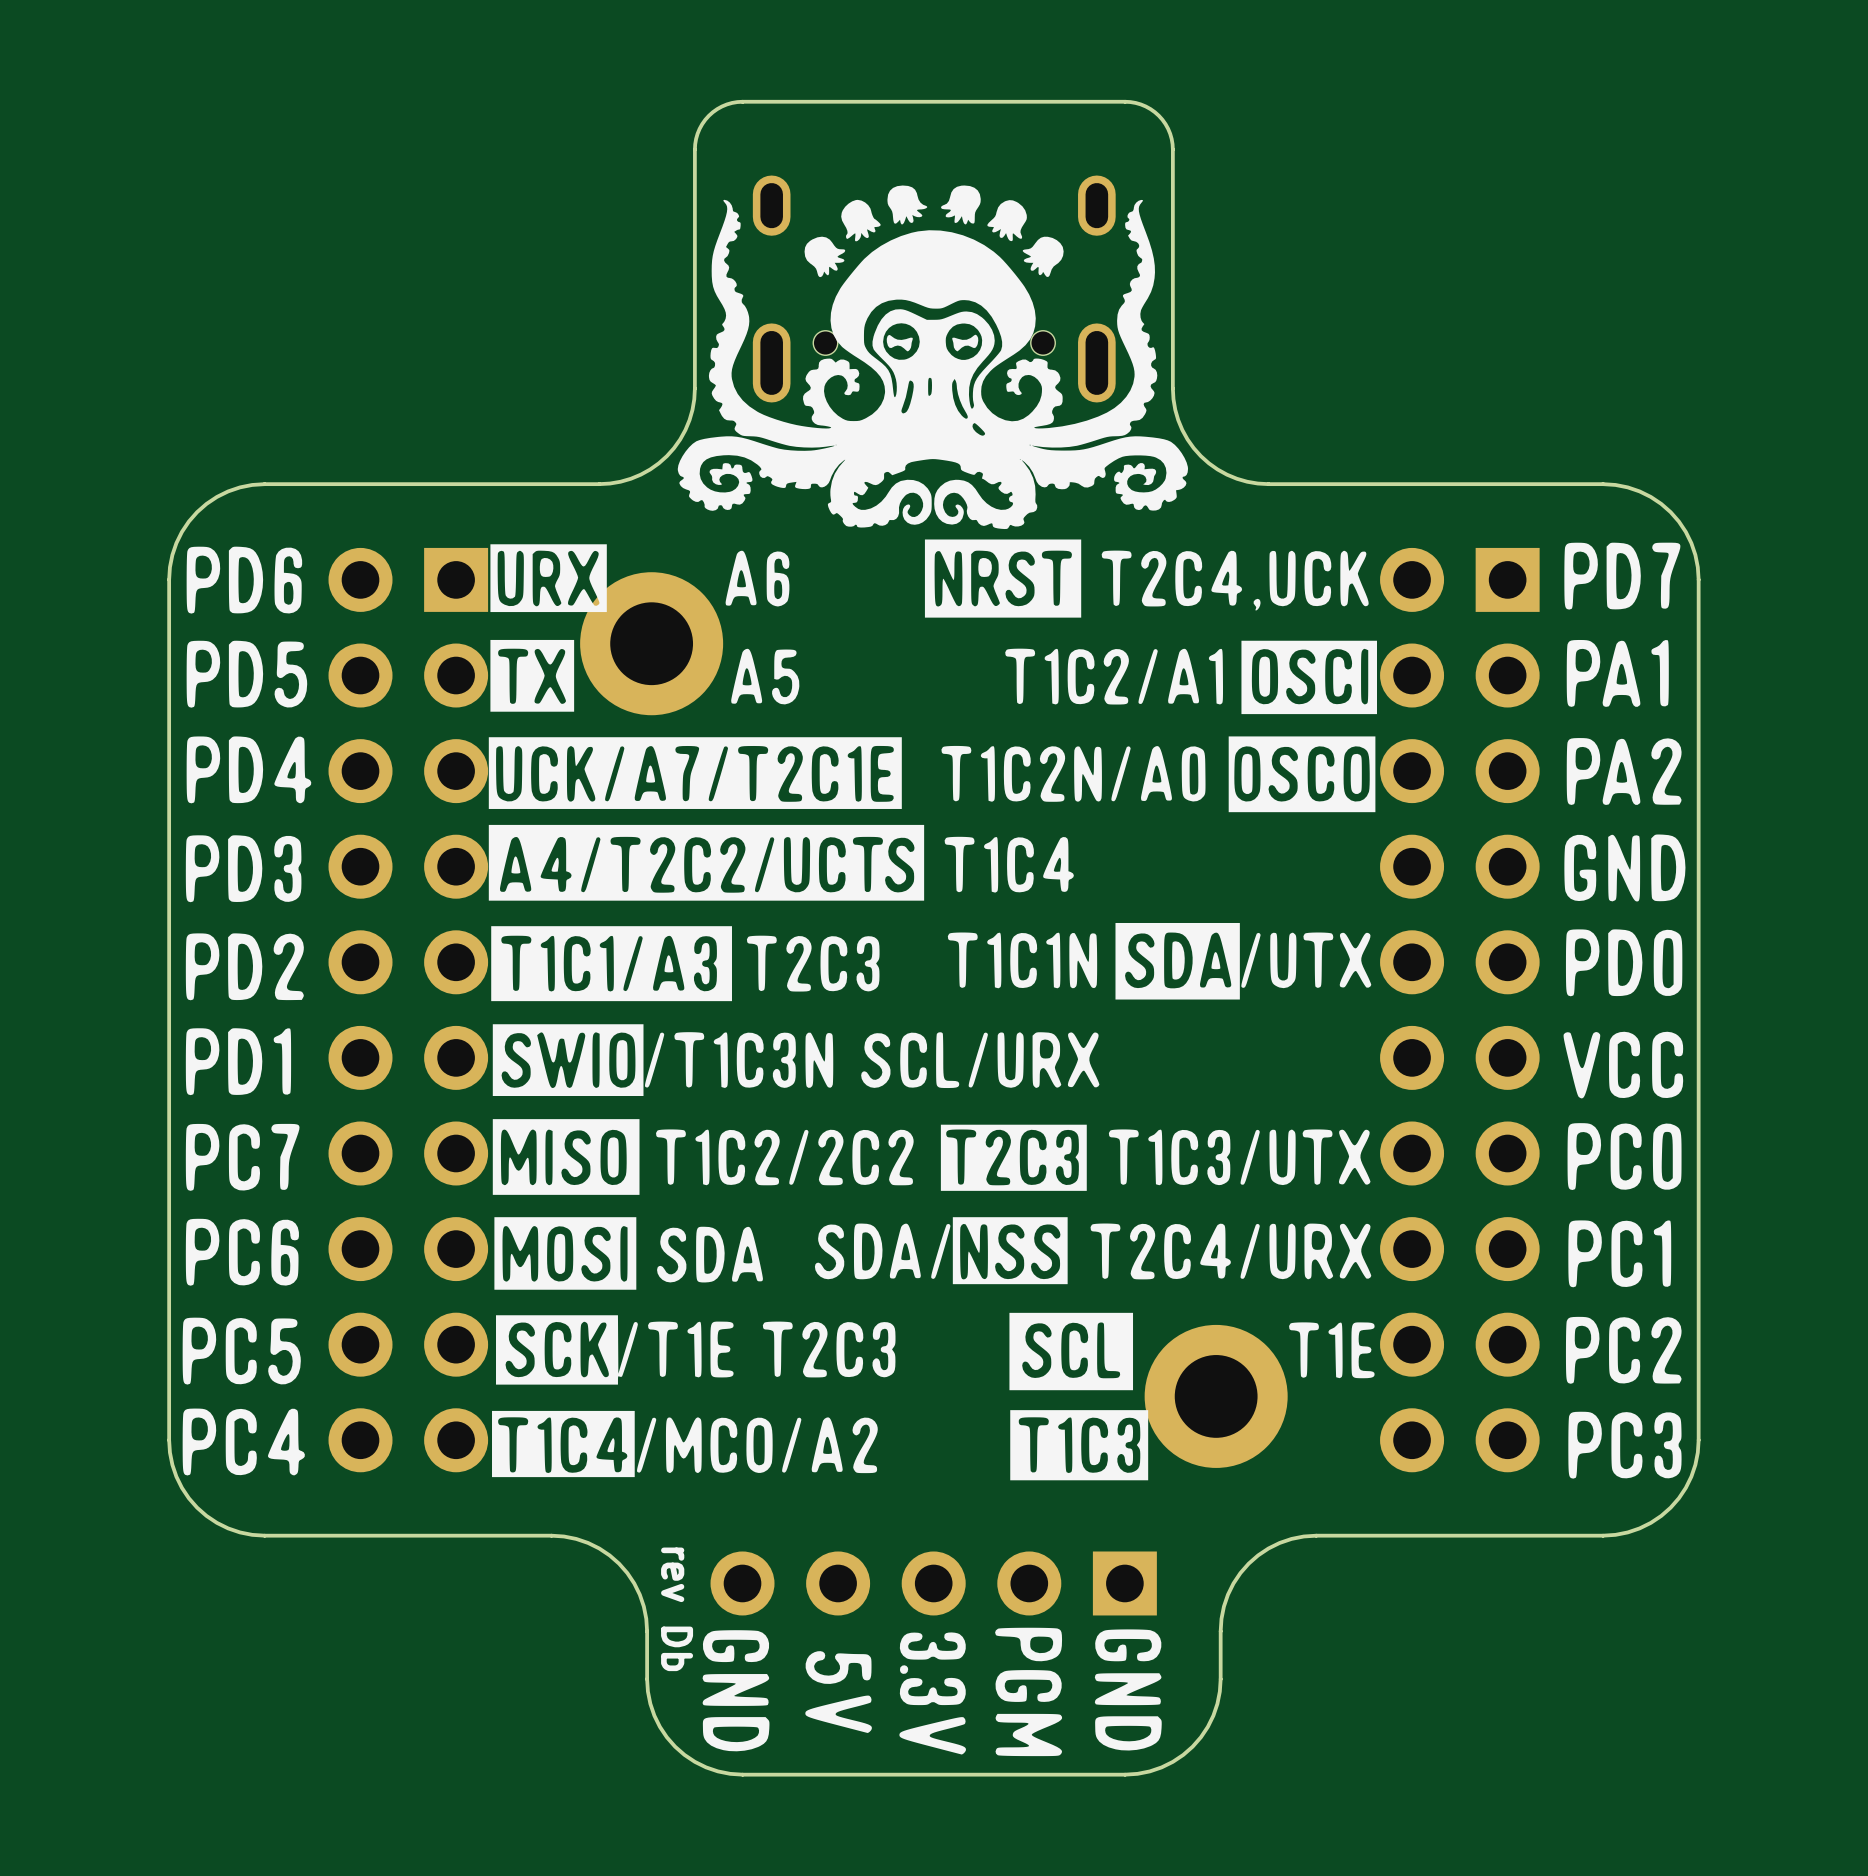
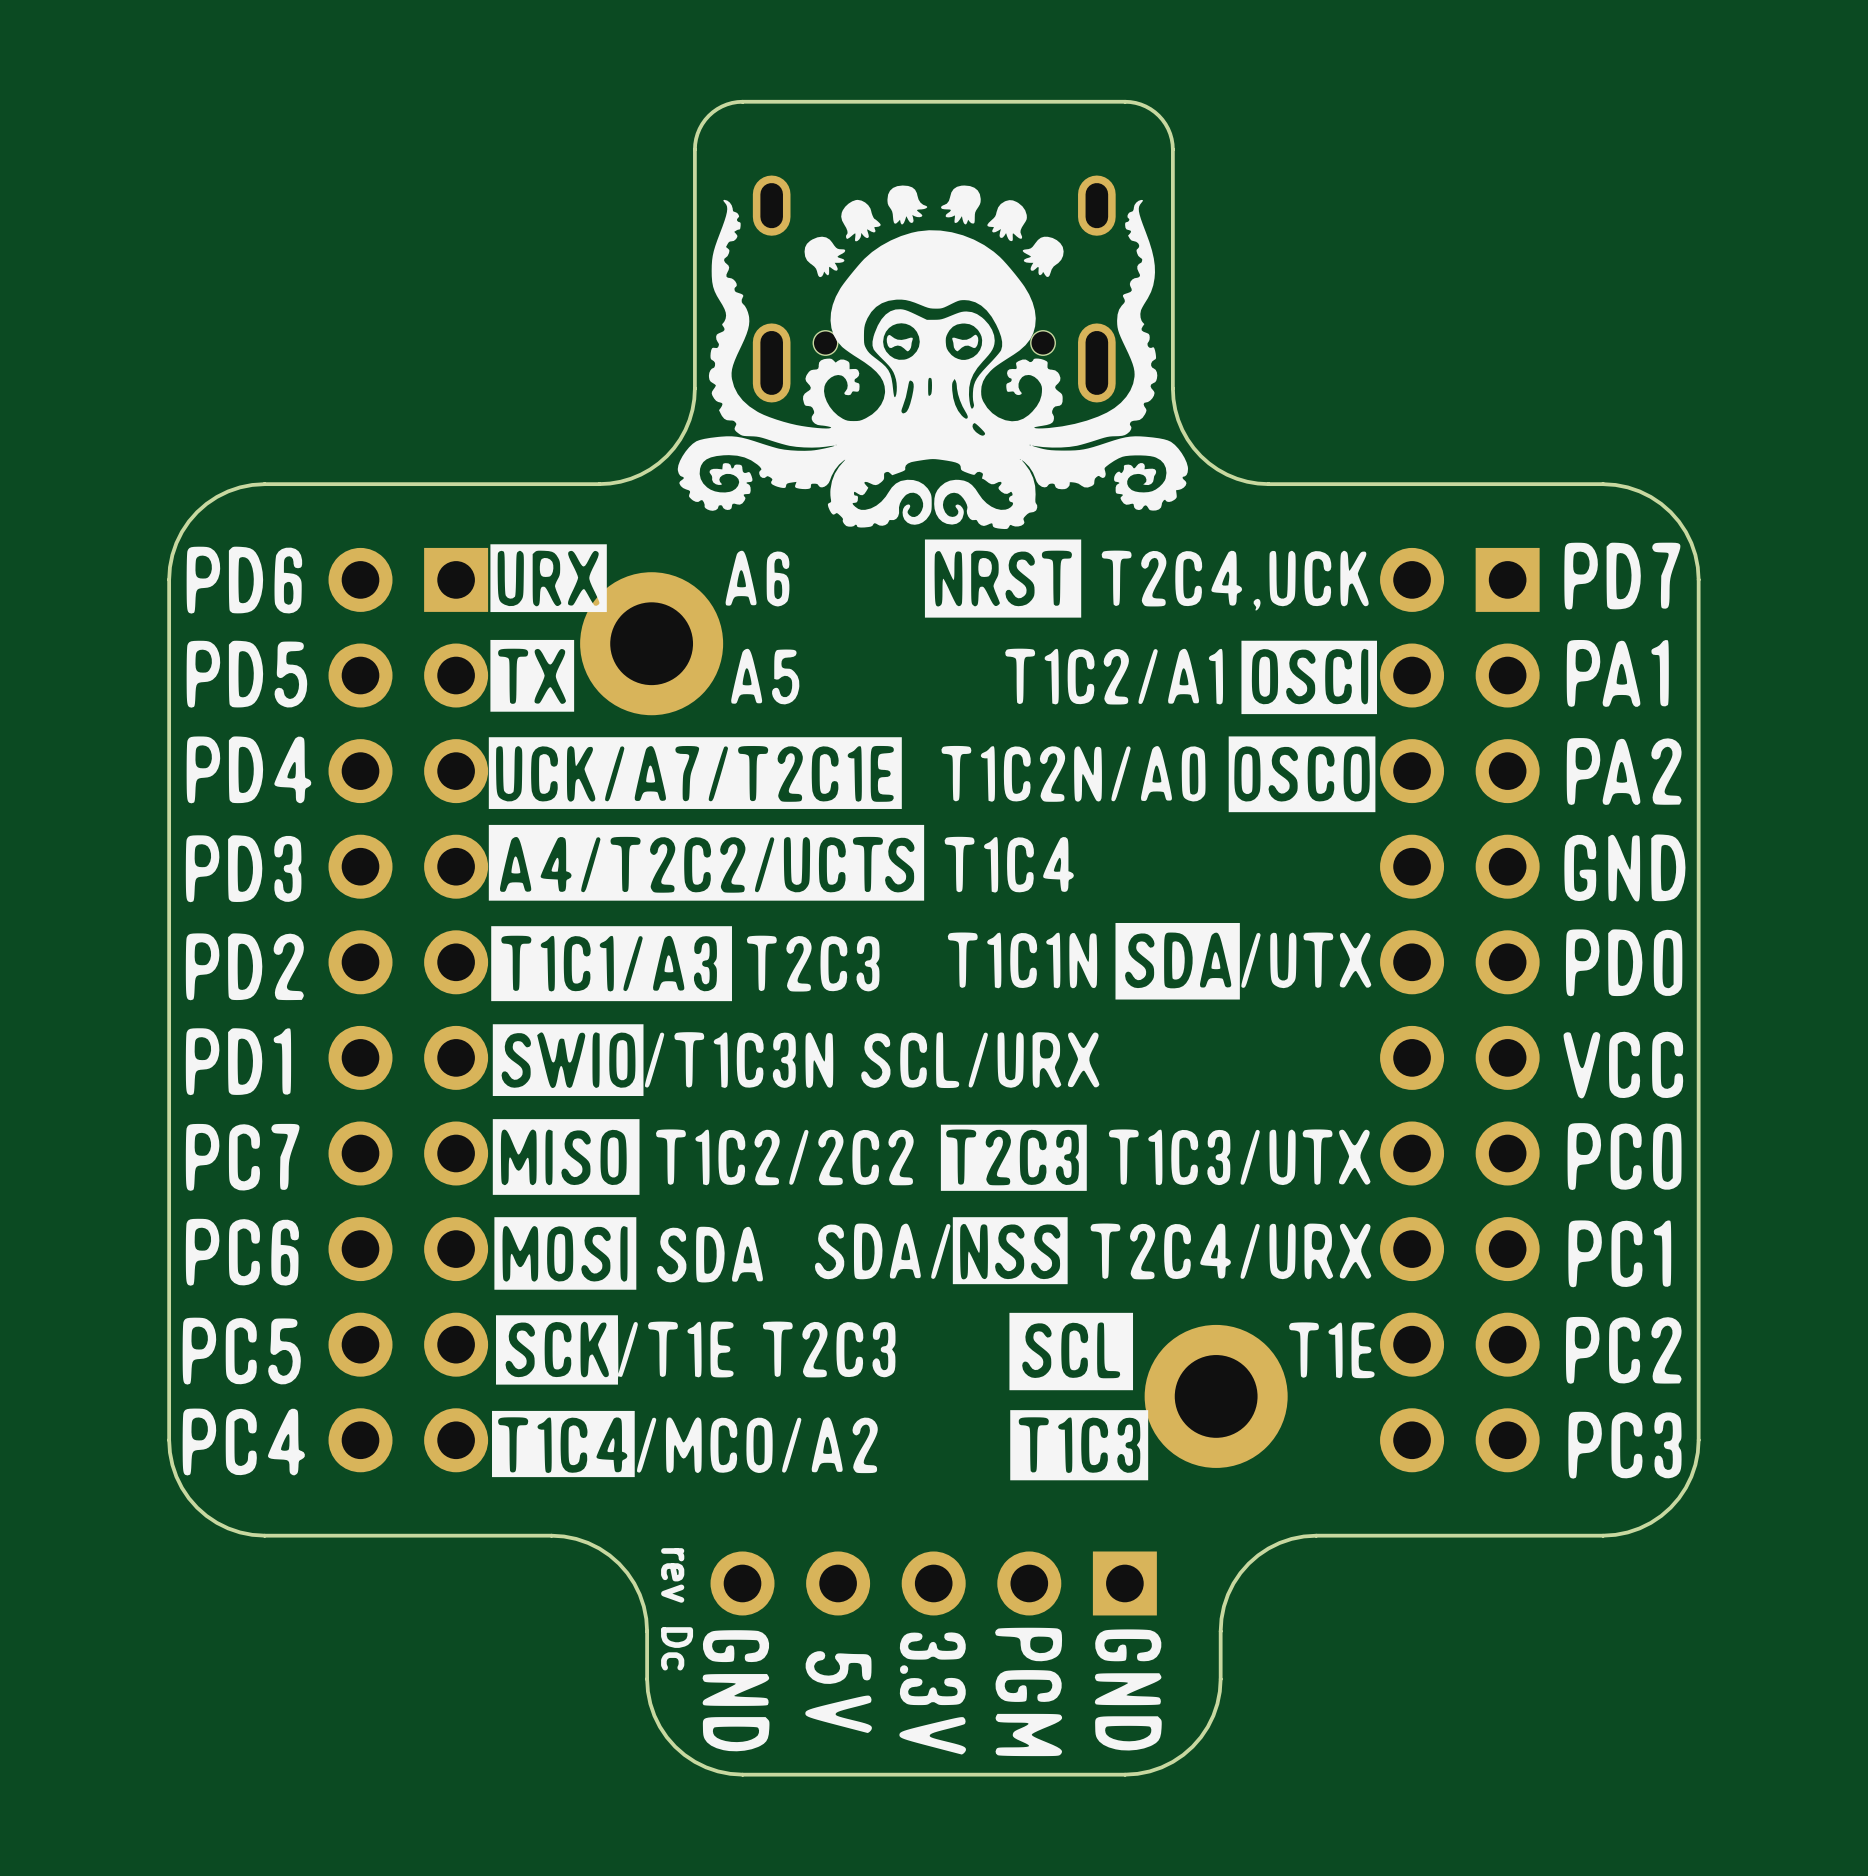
text: rev Db (677, 1609) -> rev Dc (677, 1609)

